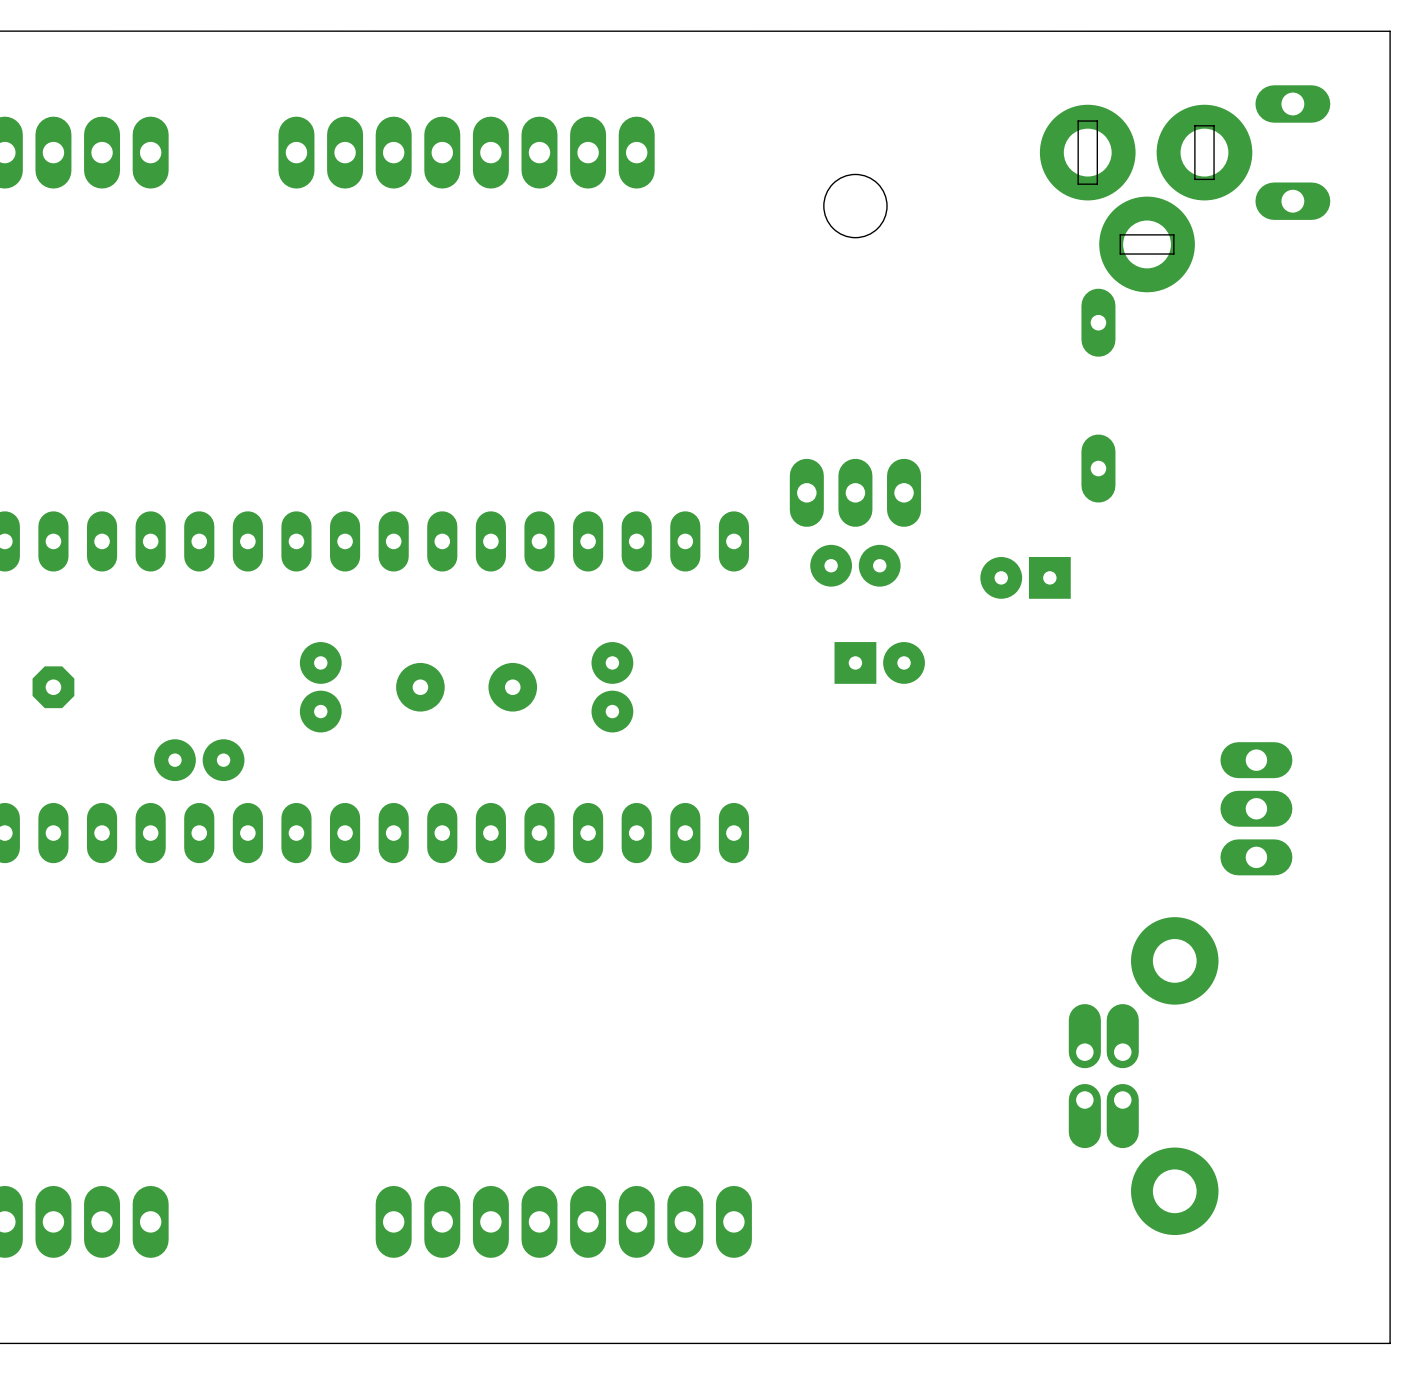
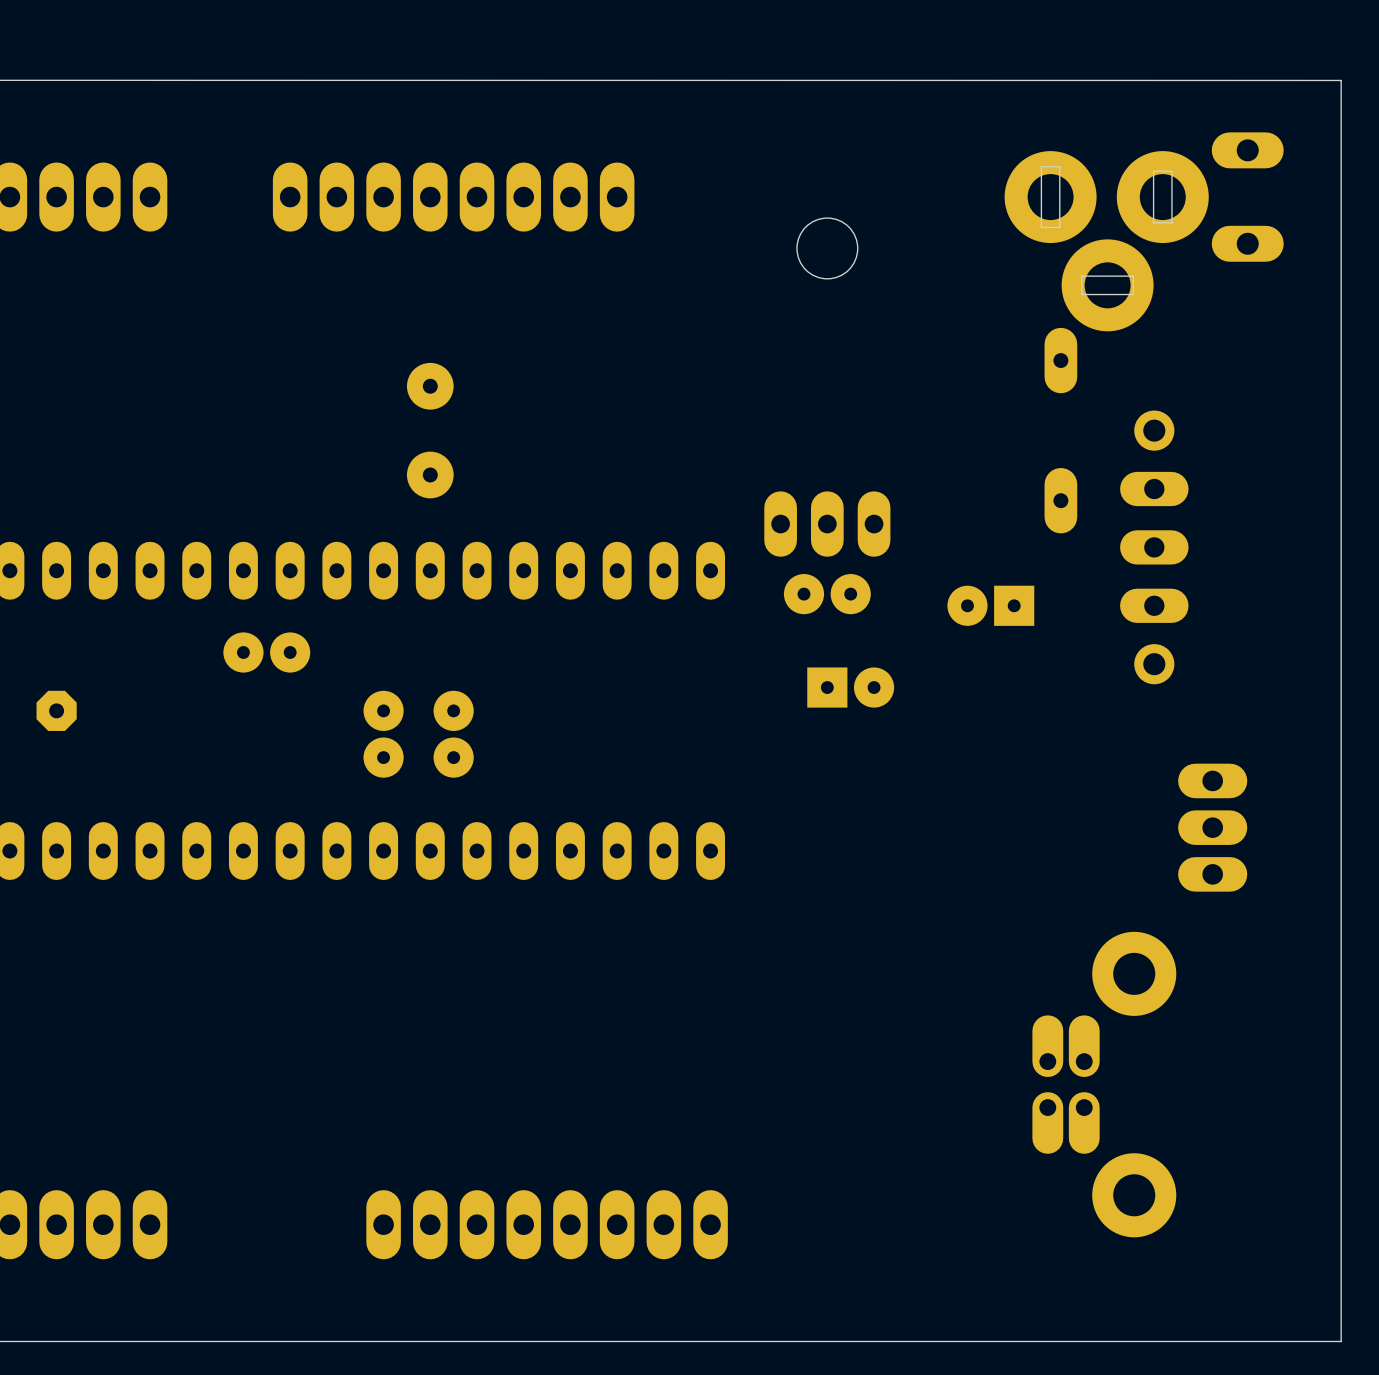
part: none -> (1154, 547)
part: none -> (266, 652)
part: (320, 687) -> none
part rotation: 0° (466, 687) -> 90° clockwise (430, 430)
part position: (466, 687) -> (430, 430)
part: (612, 687) -> none
part: none -> (383, 734)
part: none -> (453, 734)
part: (199, 760) -> none

